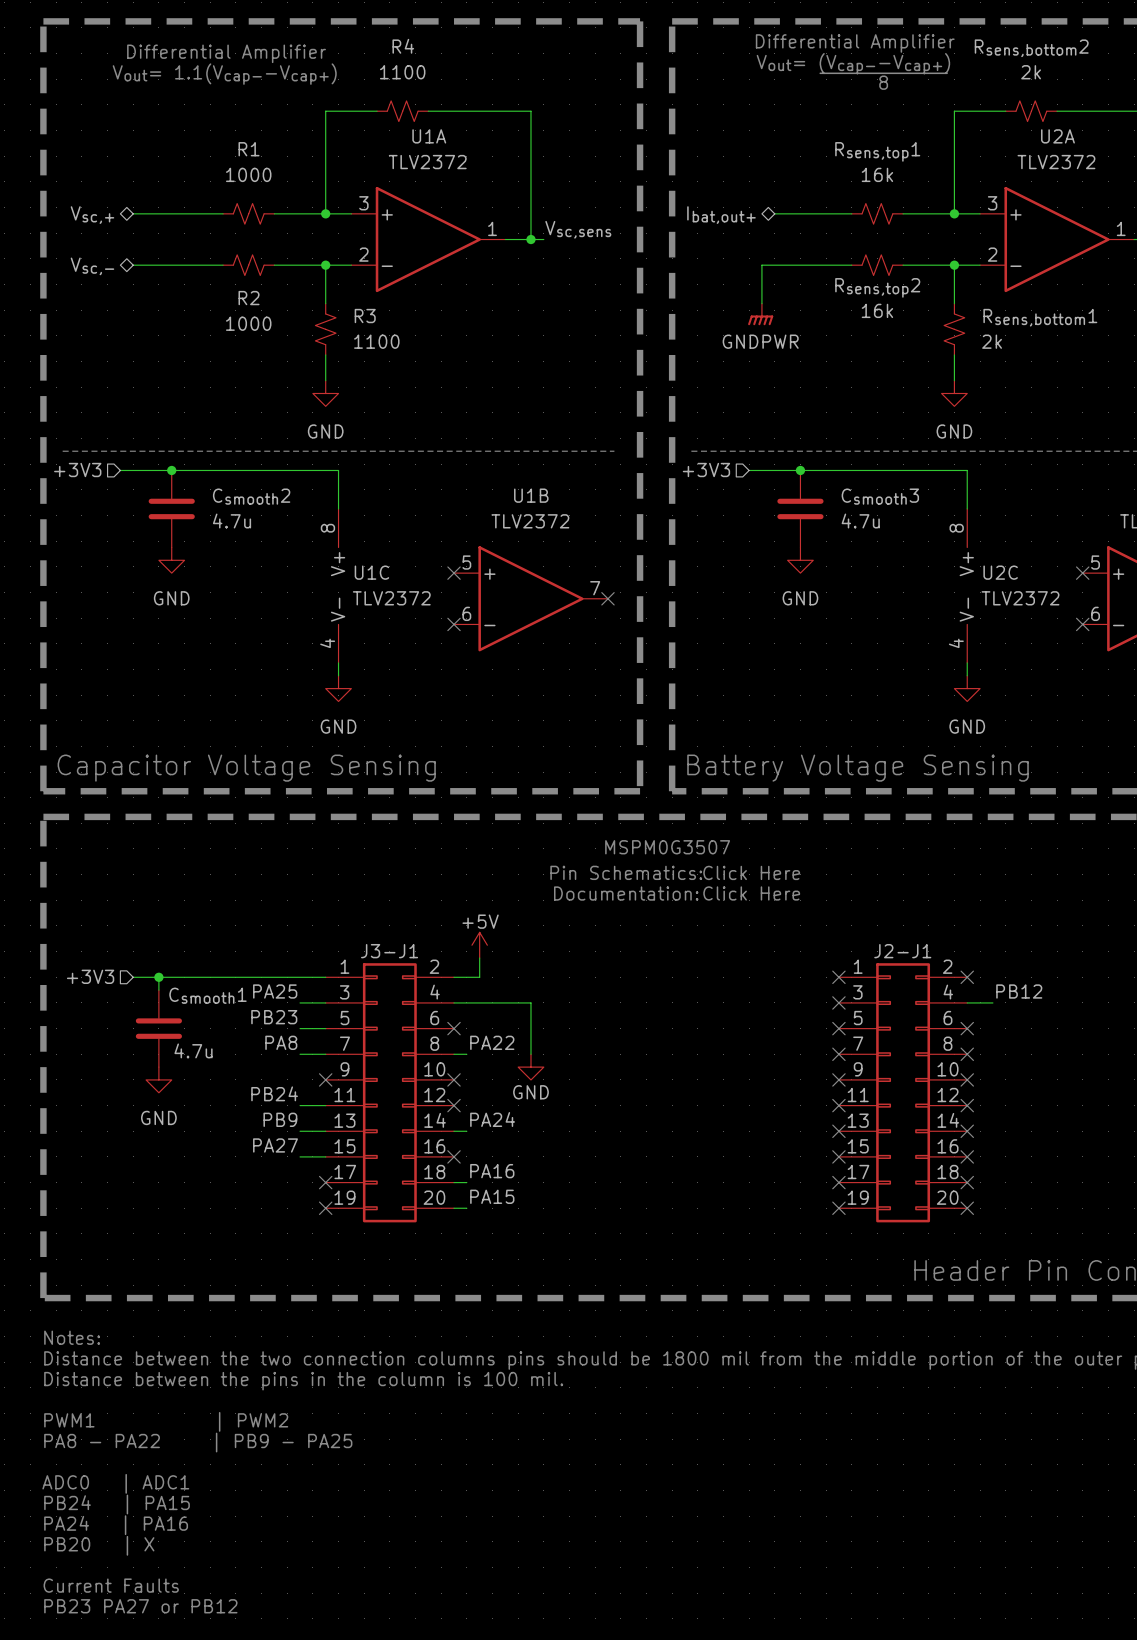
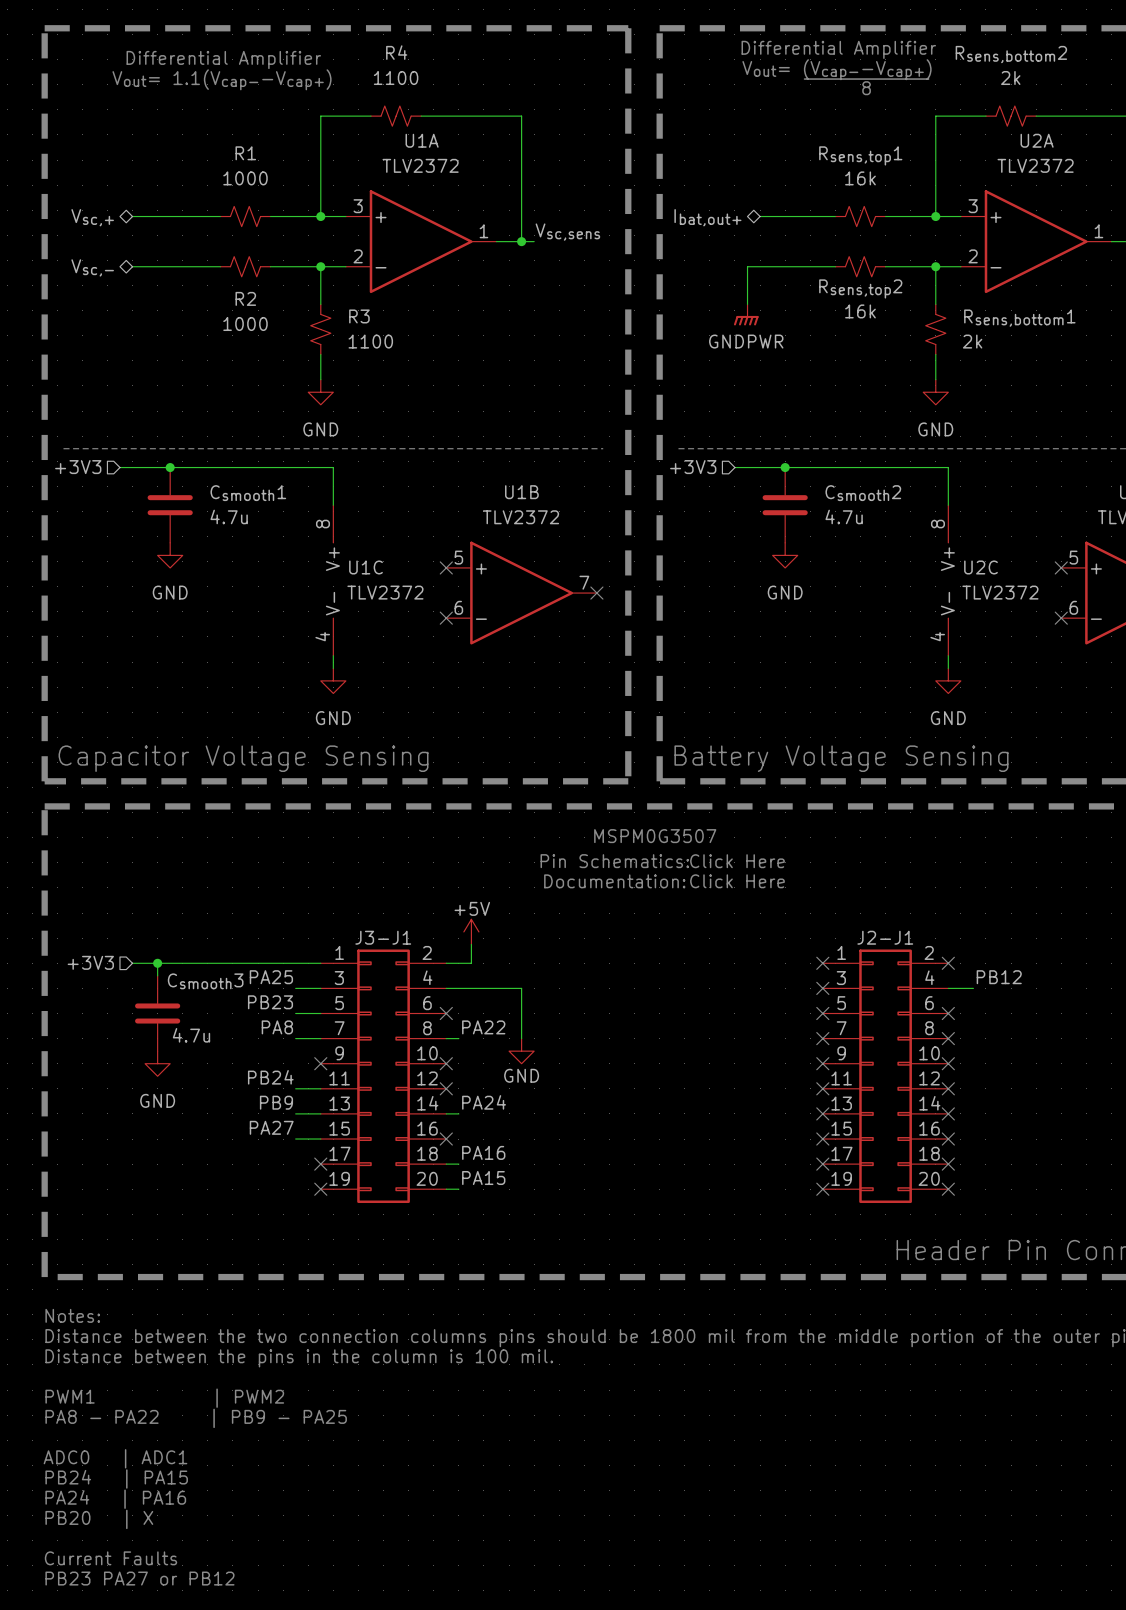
Csmooth2 name: Csmooth2 (251, 496) -> Csmooth1 (248, 493)
Csmooth3 name: Csmooth3 (880, 496) -> Csmooth2 (863, 493)
Csmooth1 name: Csmooth1 (208, 995) -> Csmooth3 (205, 981)

